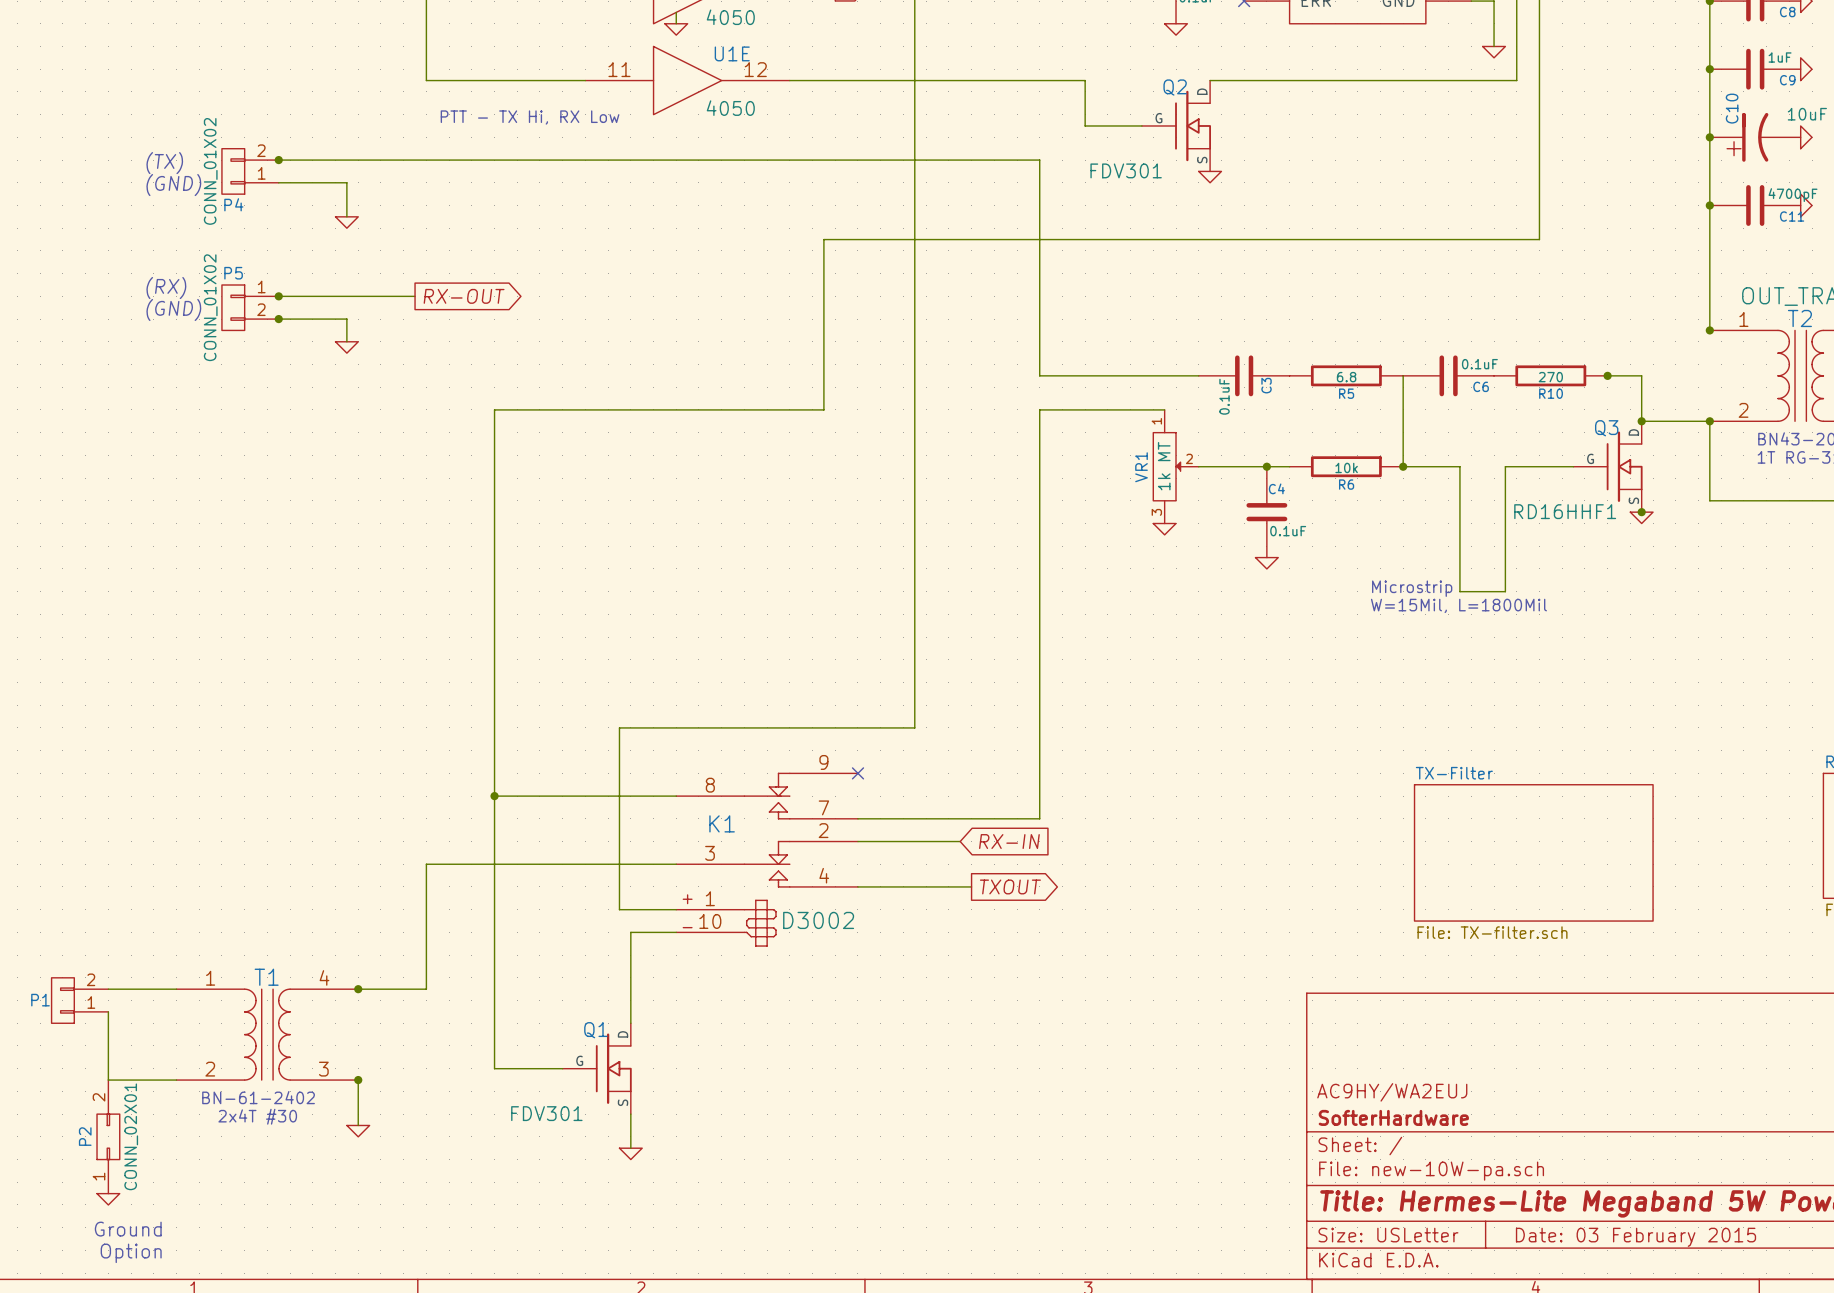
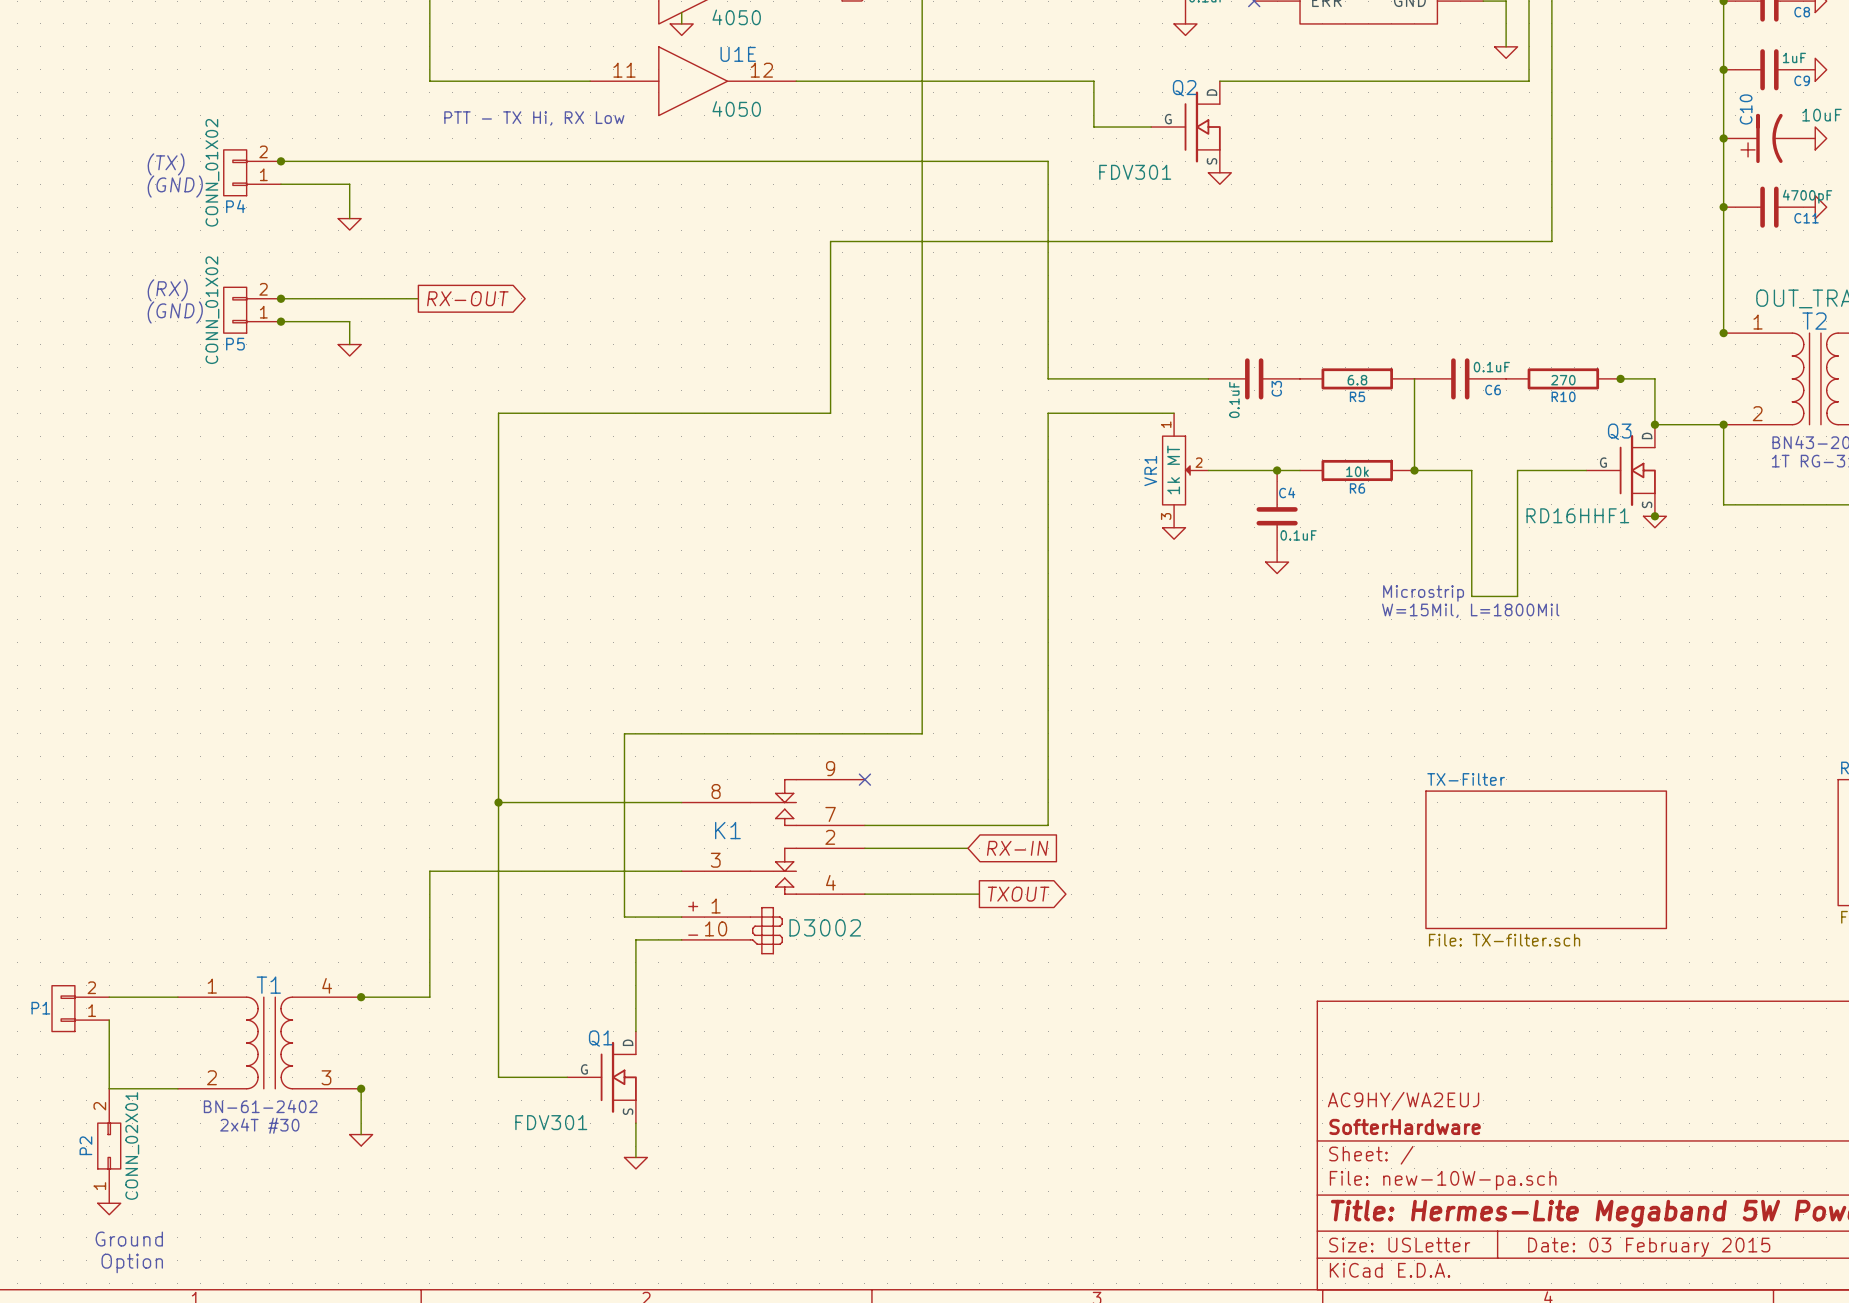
P5 flip: as is (233, 307) -> up-down (235, 310)

